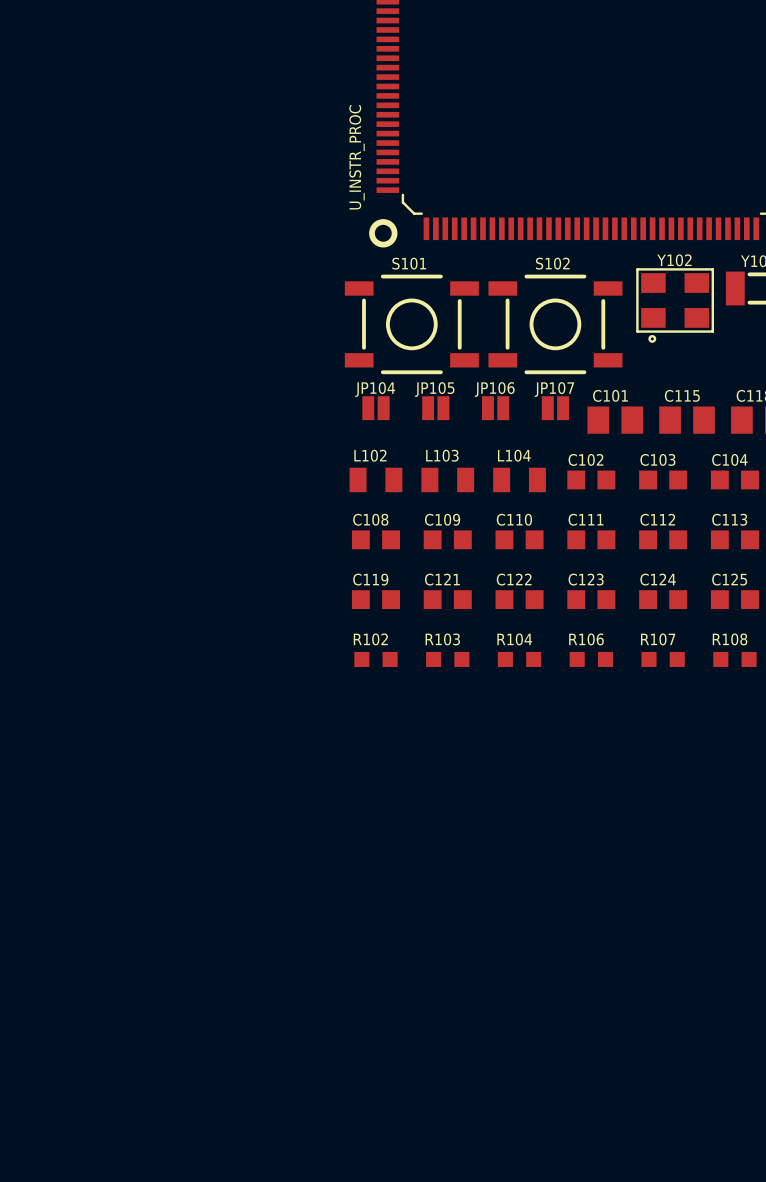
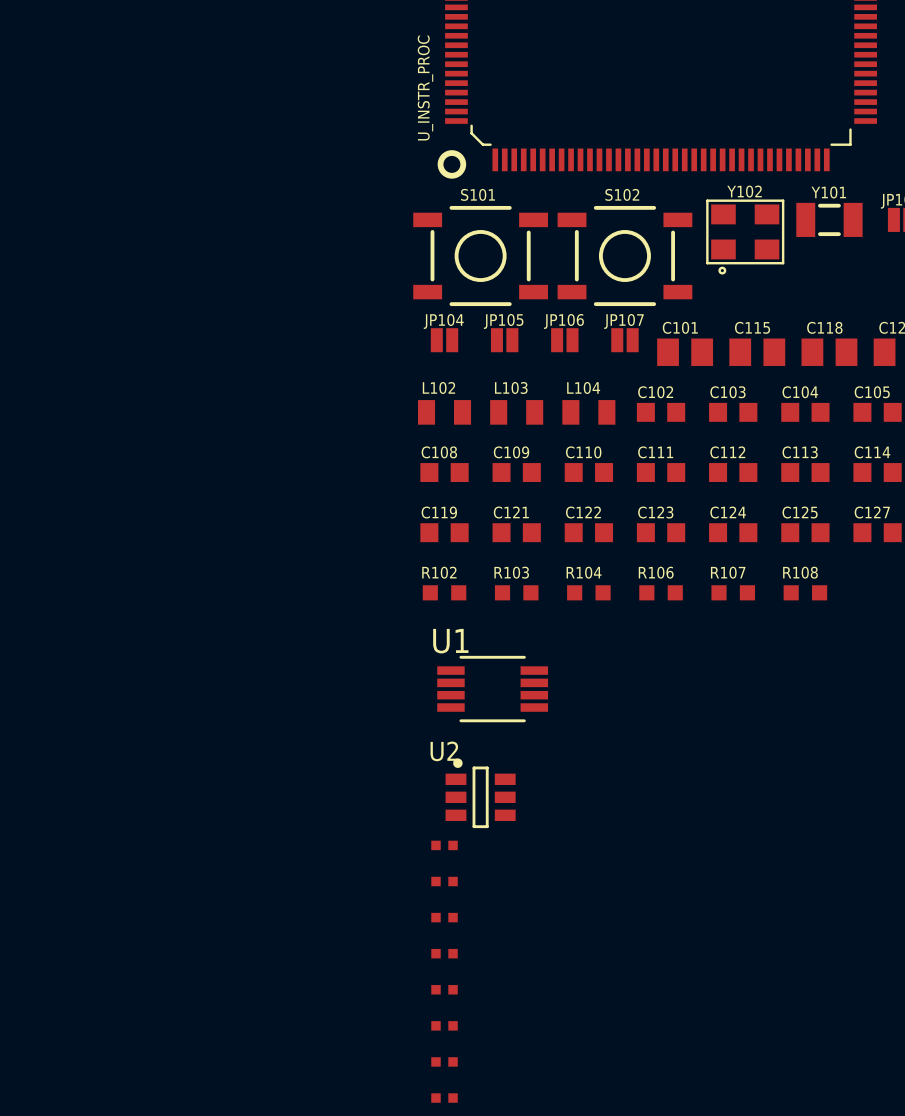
U1: none -> (492, 689)
U2: none -> (480, 793)
part: none -> (444, 845)
part: none -> (444, 881)
part: none -> (444, 917)
part: none -> (444, 953)
part: none -> (444, 989)
part: none -> (444, 1025)
part: none -> (444, 1061)
part: none -> (444, 1098)

